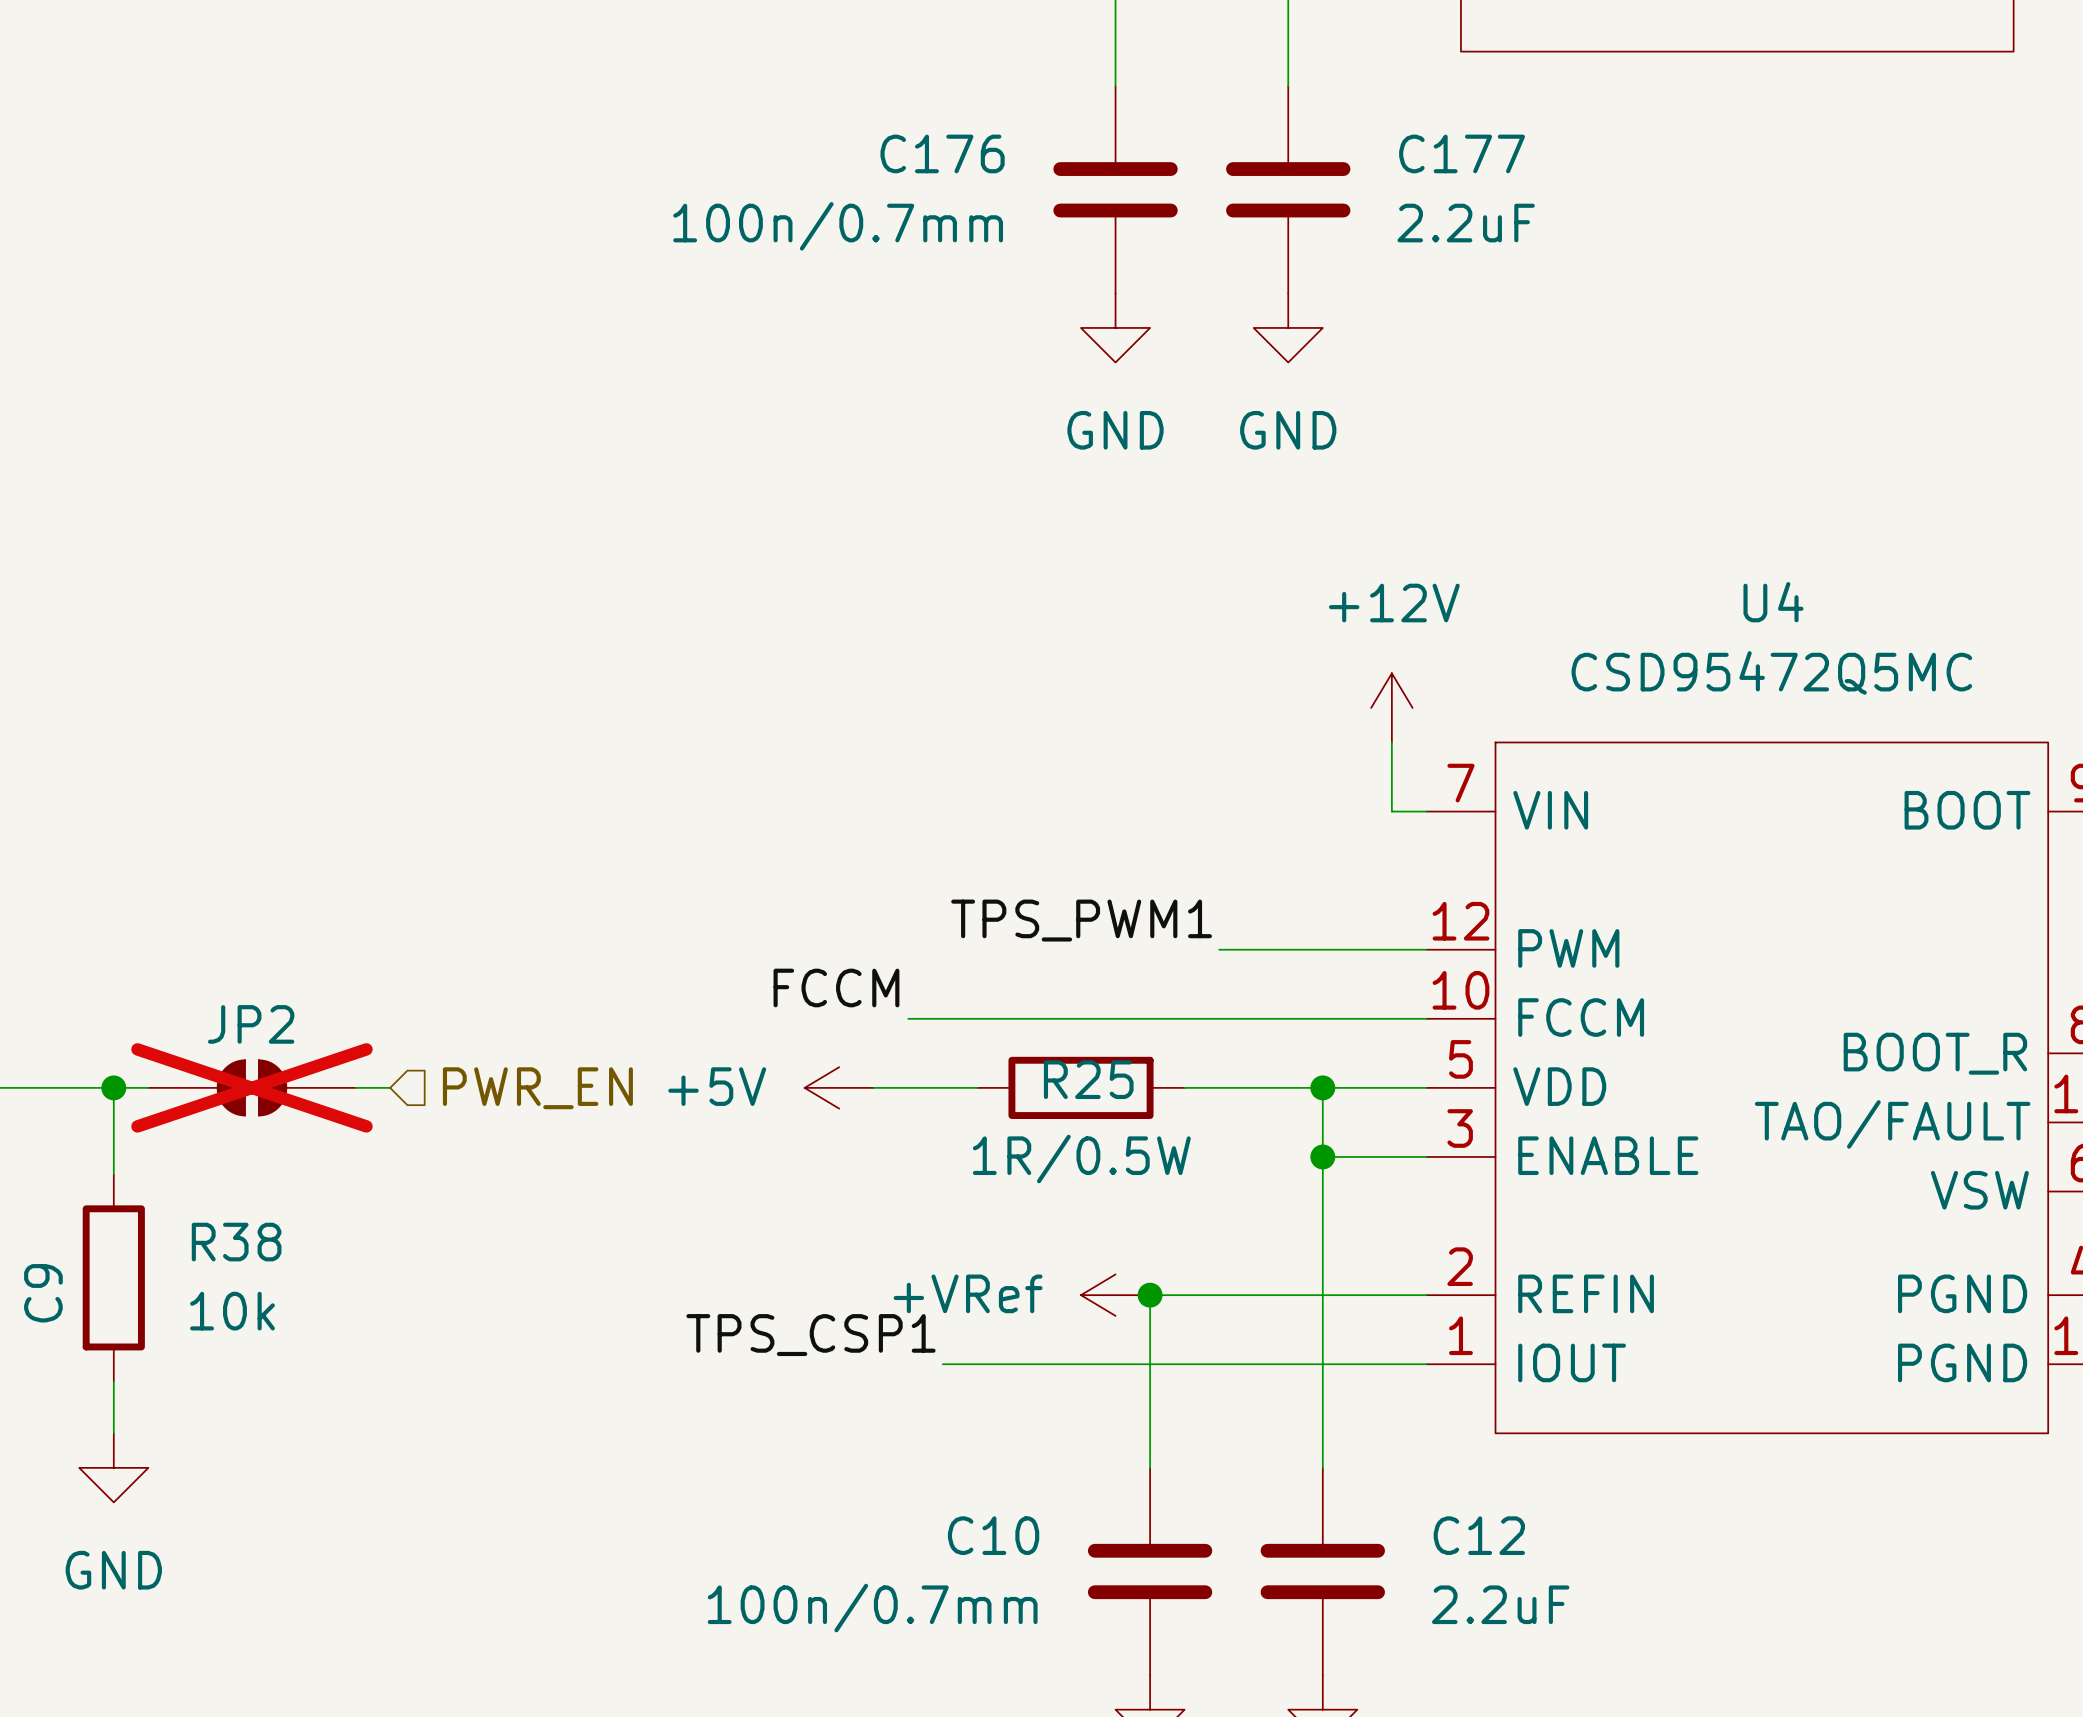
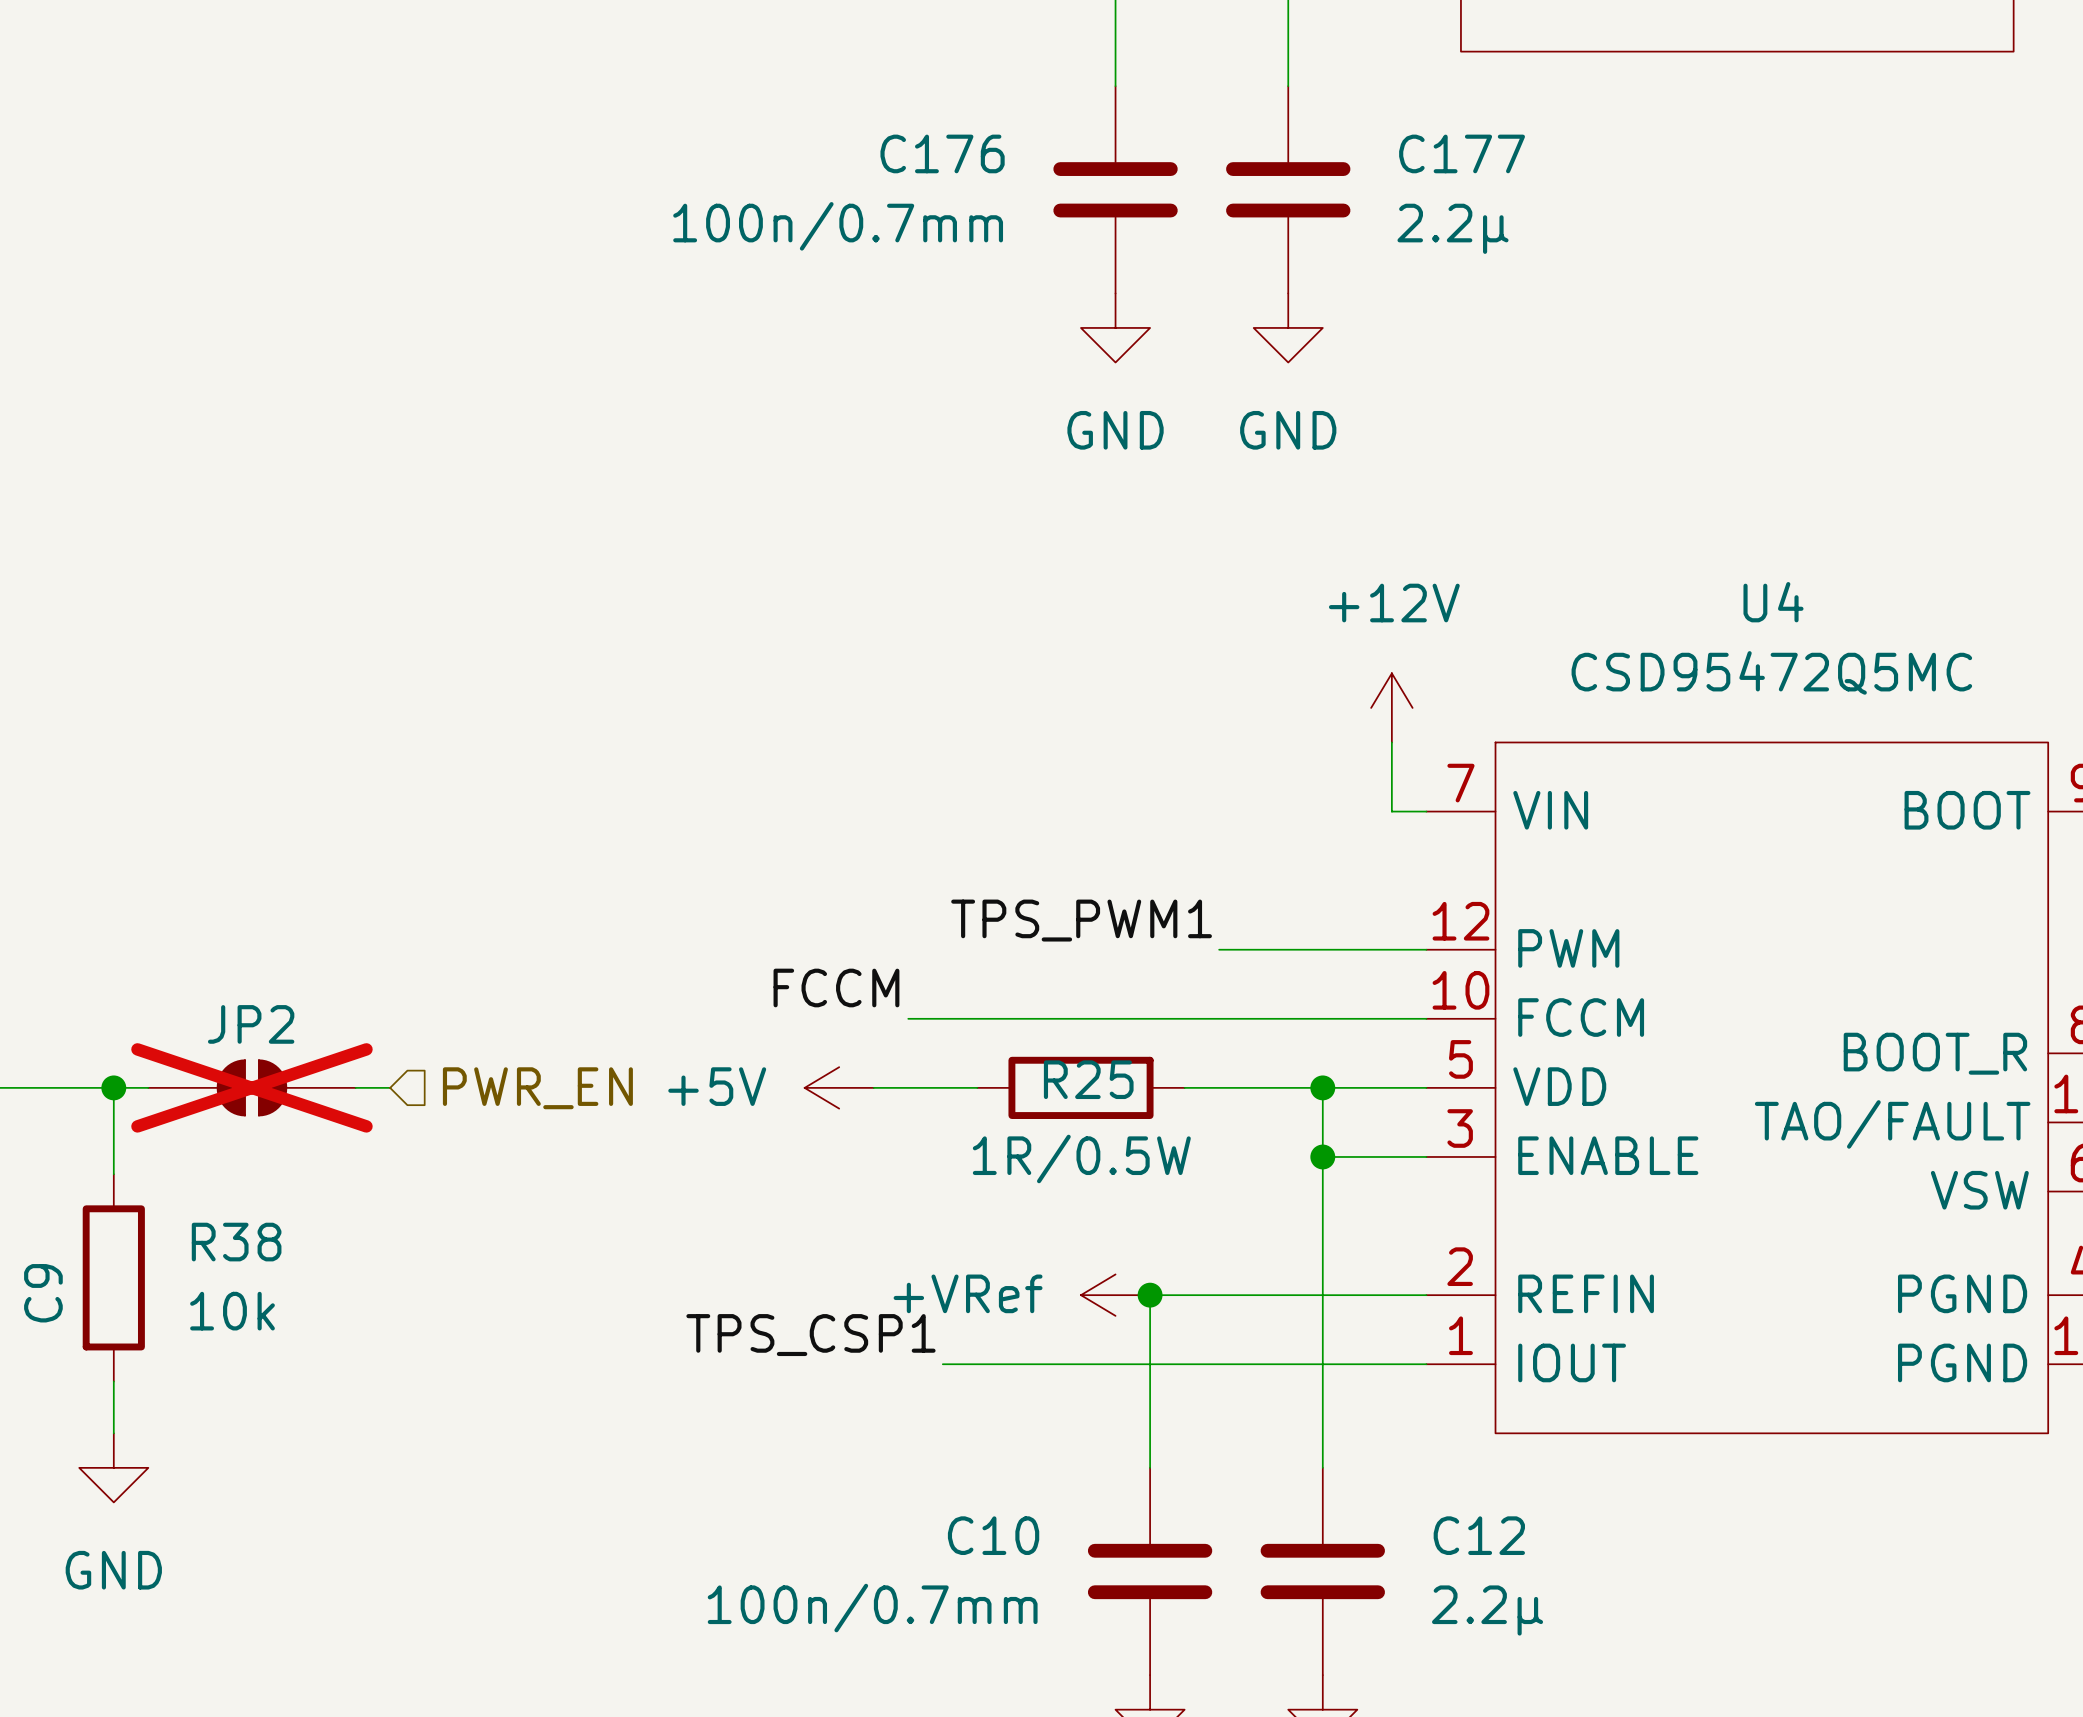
C177 value: 2.2uF (1466, 223) -> 2.2µ (1453, 228)
C12 value: 2.2uF (1500, 1604) -> 2.2µ (1487, 1610)

